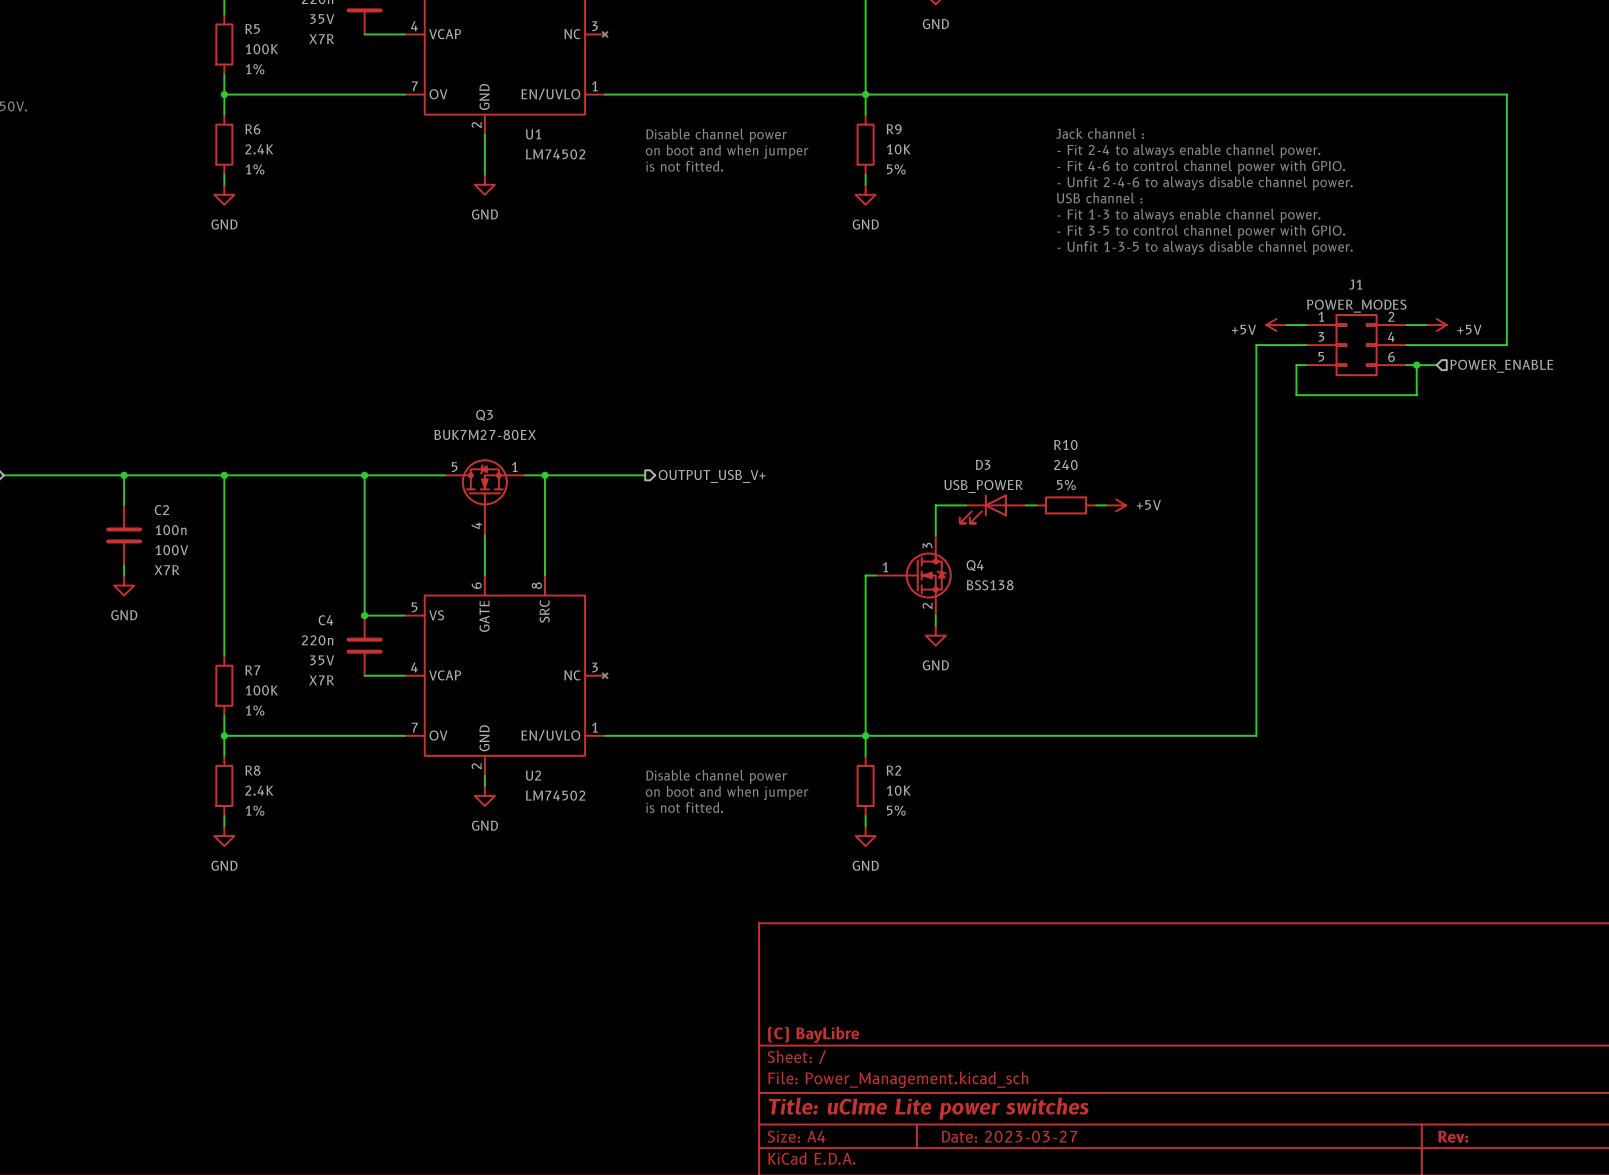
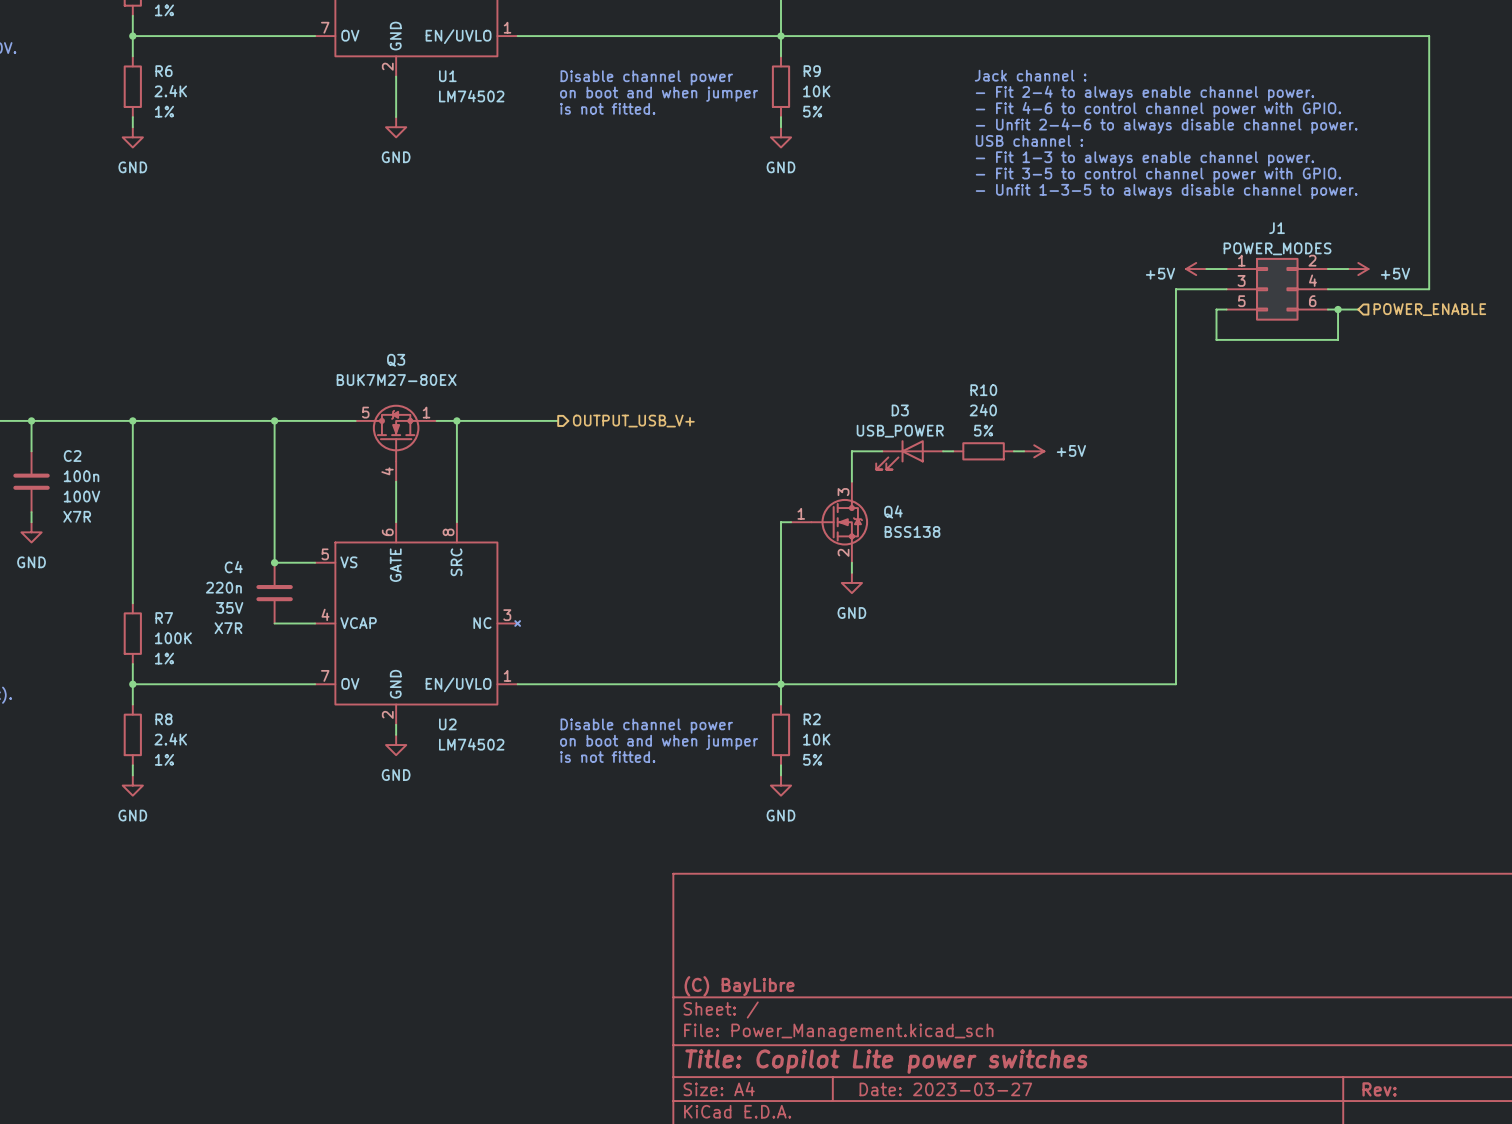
title block: Title: uCIme Lite power switches (928, 1108) -> Title: Copilot Lite power switches (886, 1061)

